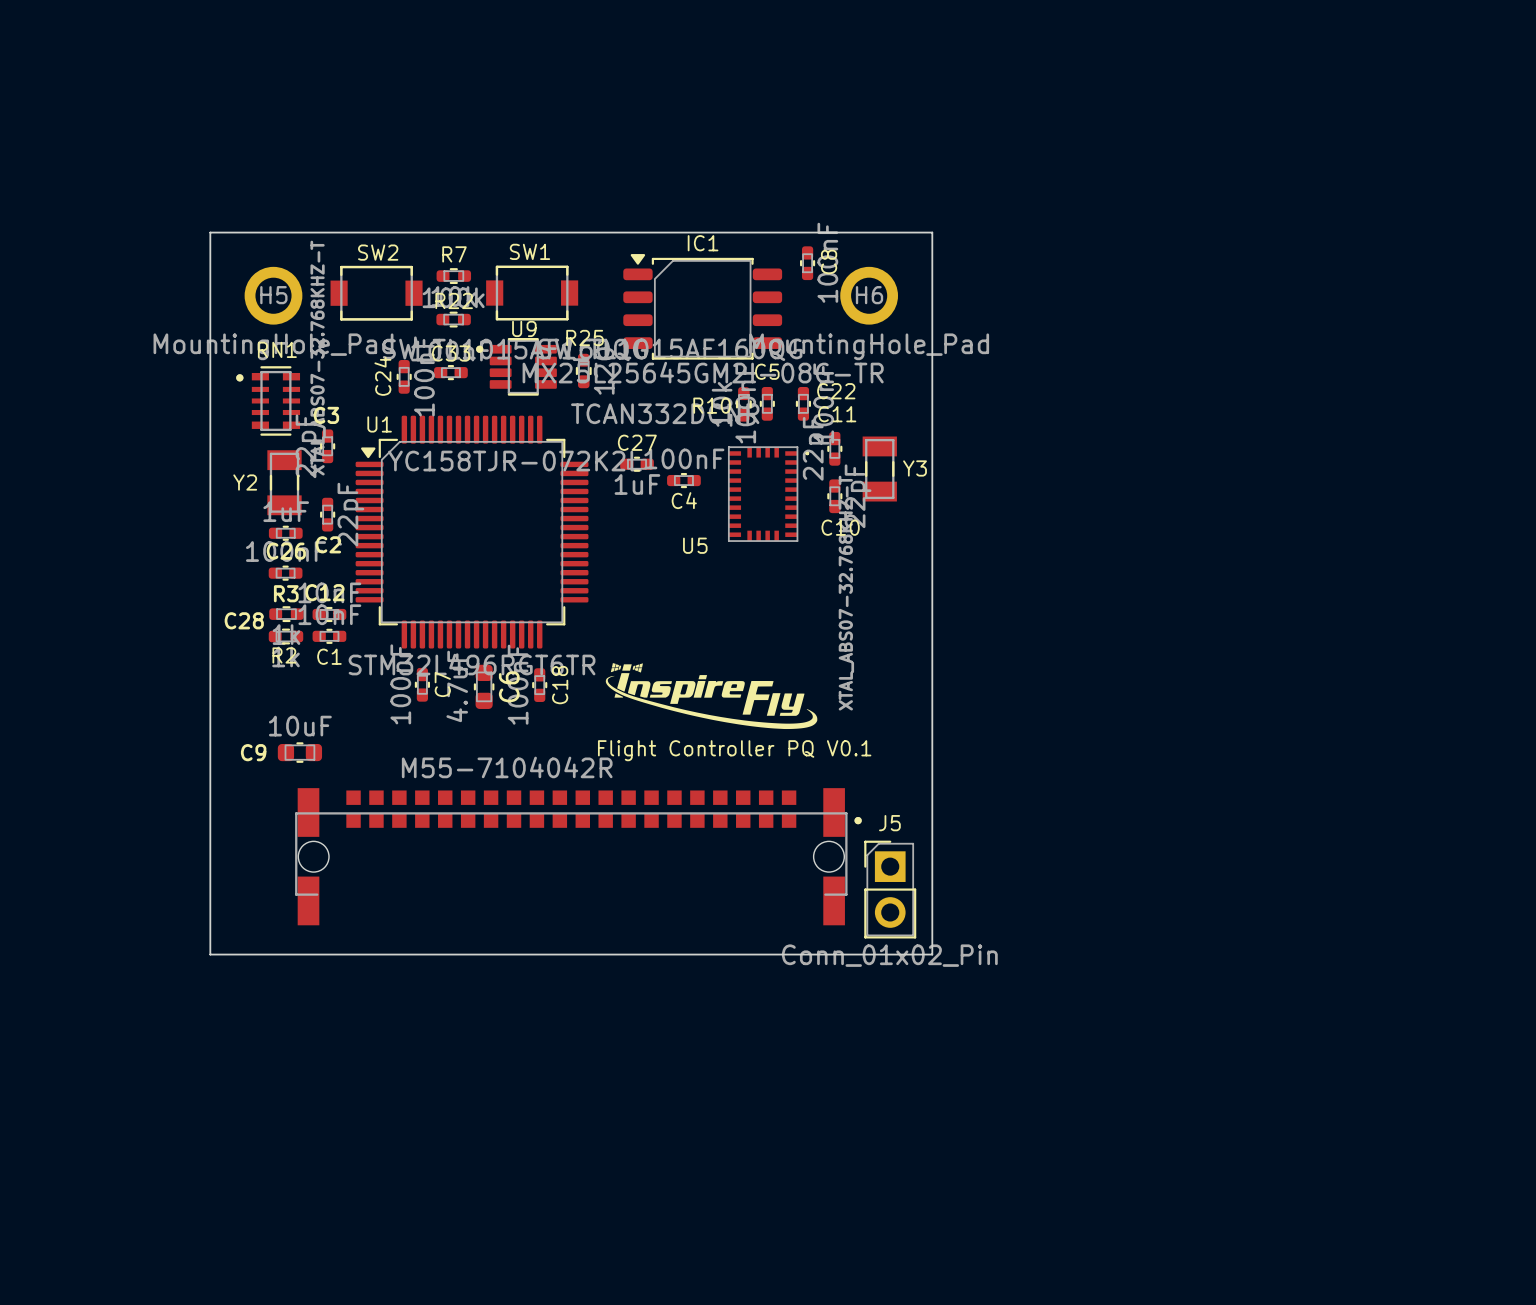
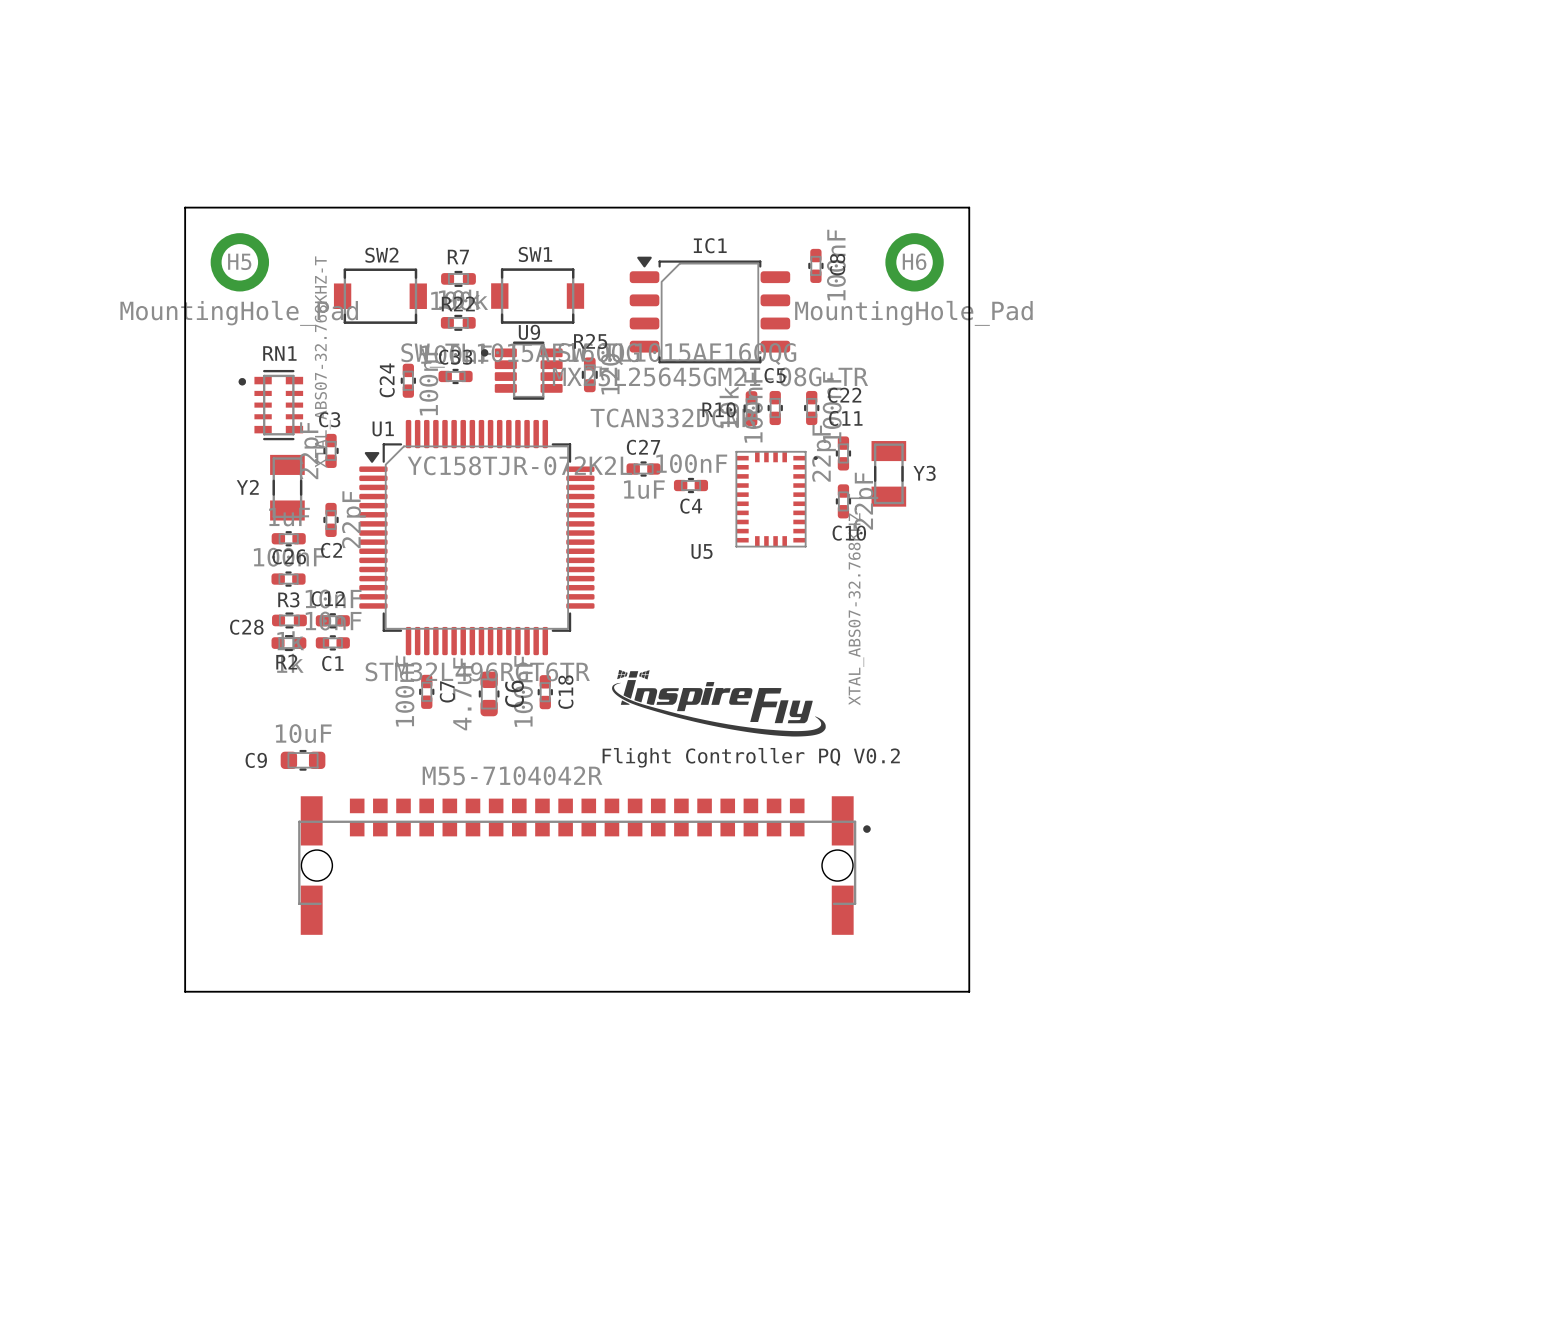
board edge: (210, 232) (932, 232) (932, 954) (210, 954) (210, 232) -> (185, 207) (185, 991) (969, 991) (969, 207) (185, 207)
H5 position: (273, 295) -> (239, 262)
H6 position: (869, 295) -> (914, 262)
text: Flight Controller PQ V0.1 (734, 750) -> Flight Controller PQ V0.2 (751, 757)
J5: Conn_01x02_Pin (890, 889) -> none

